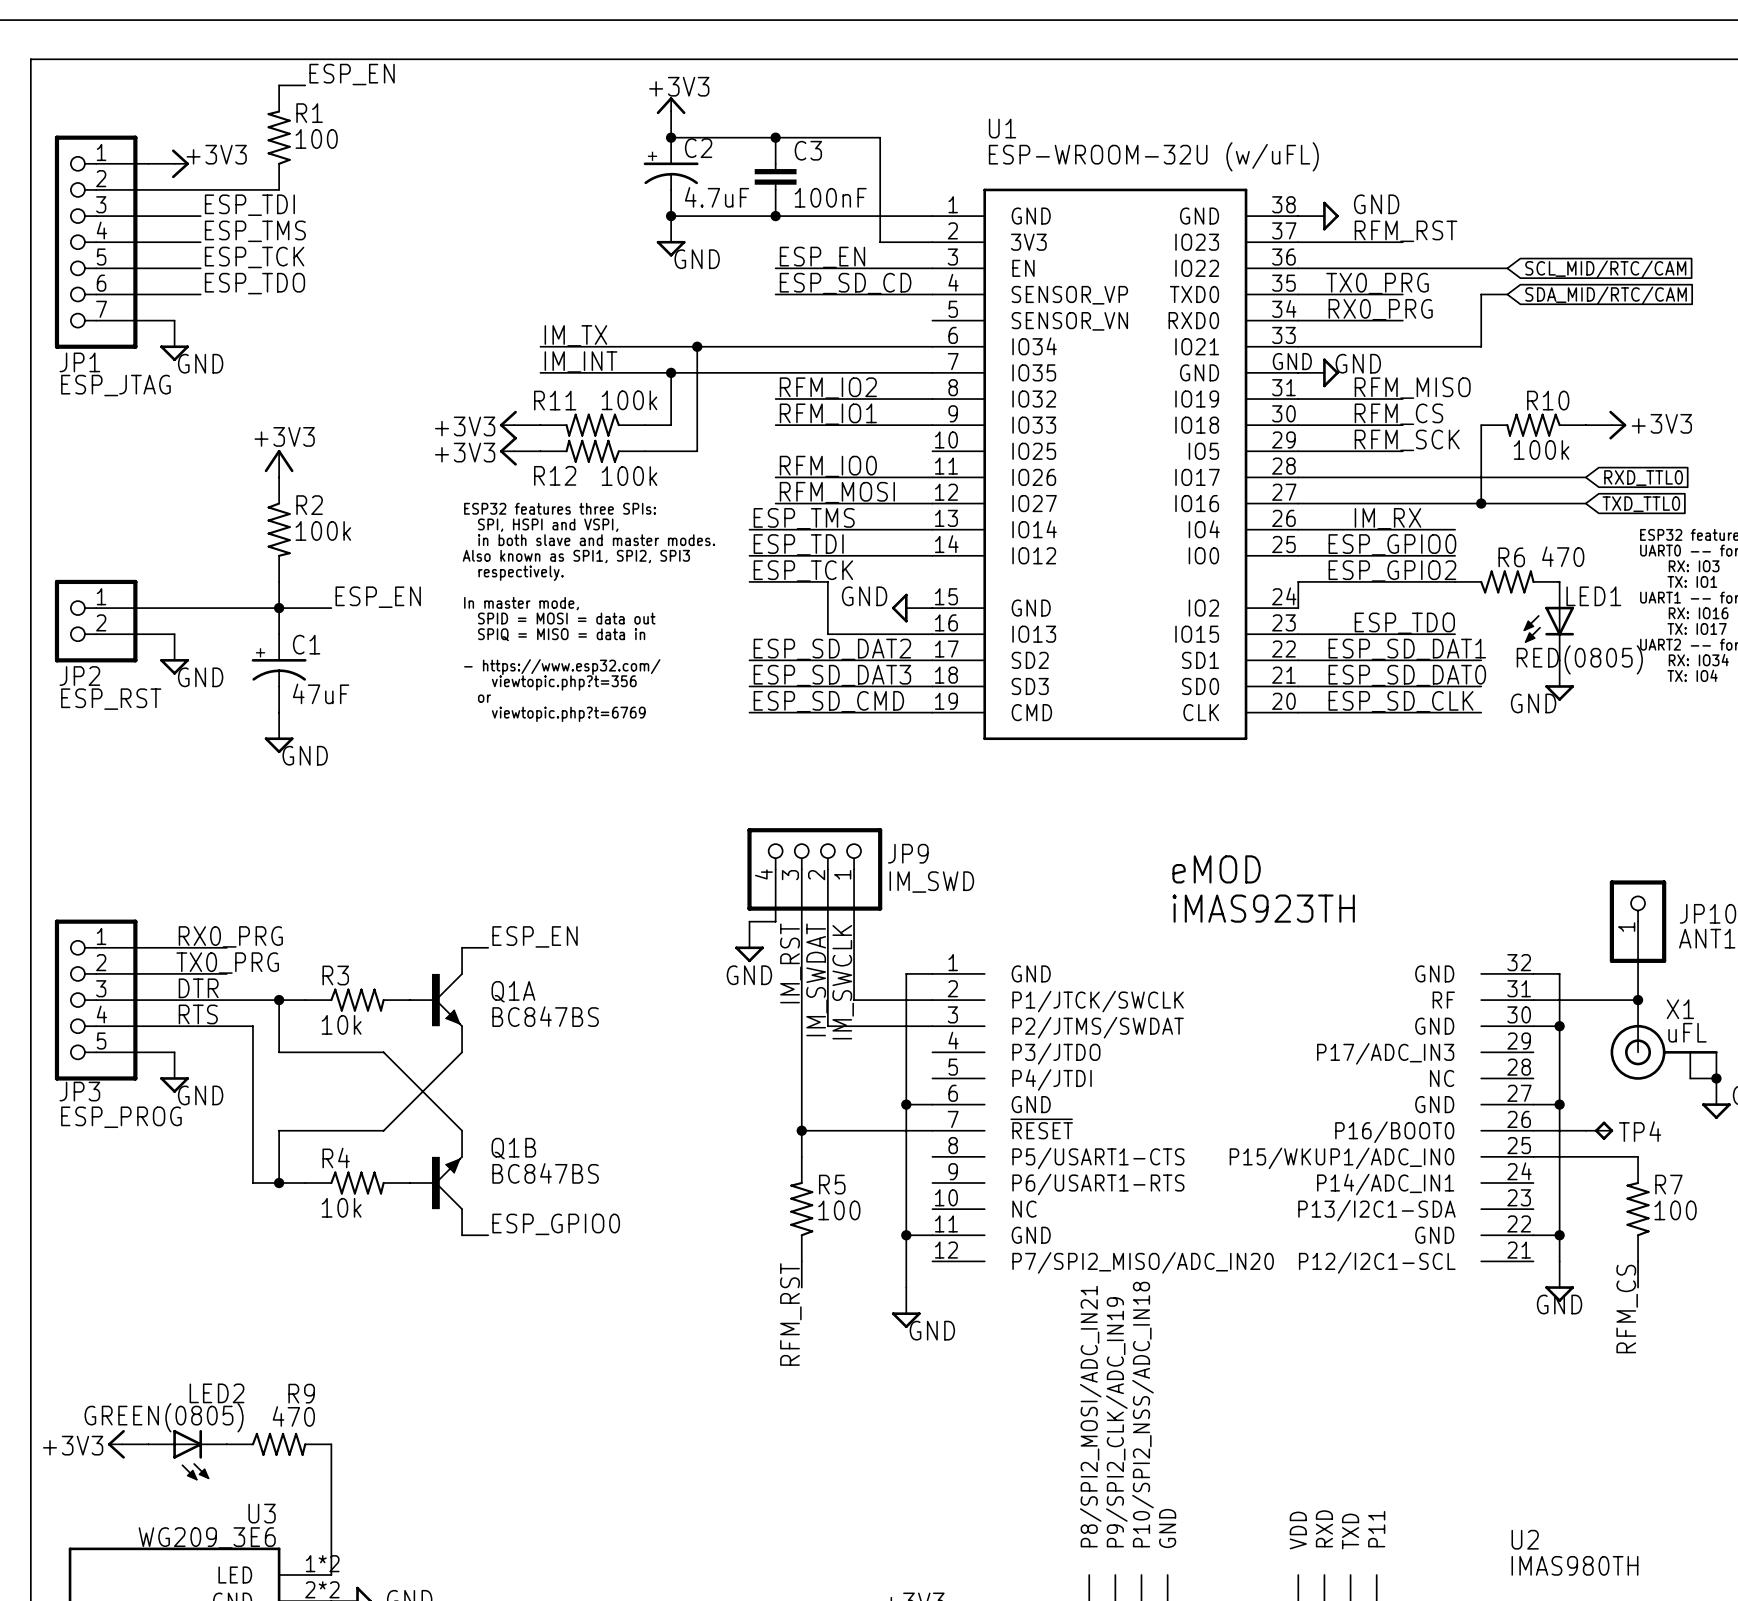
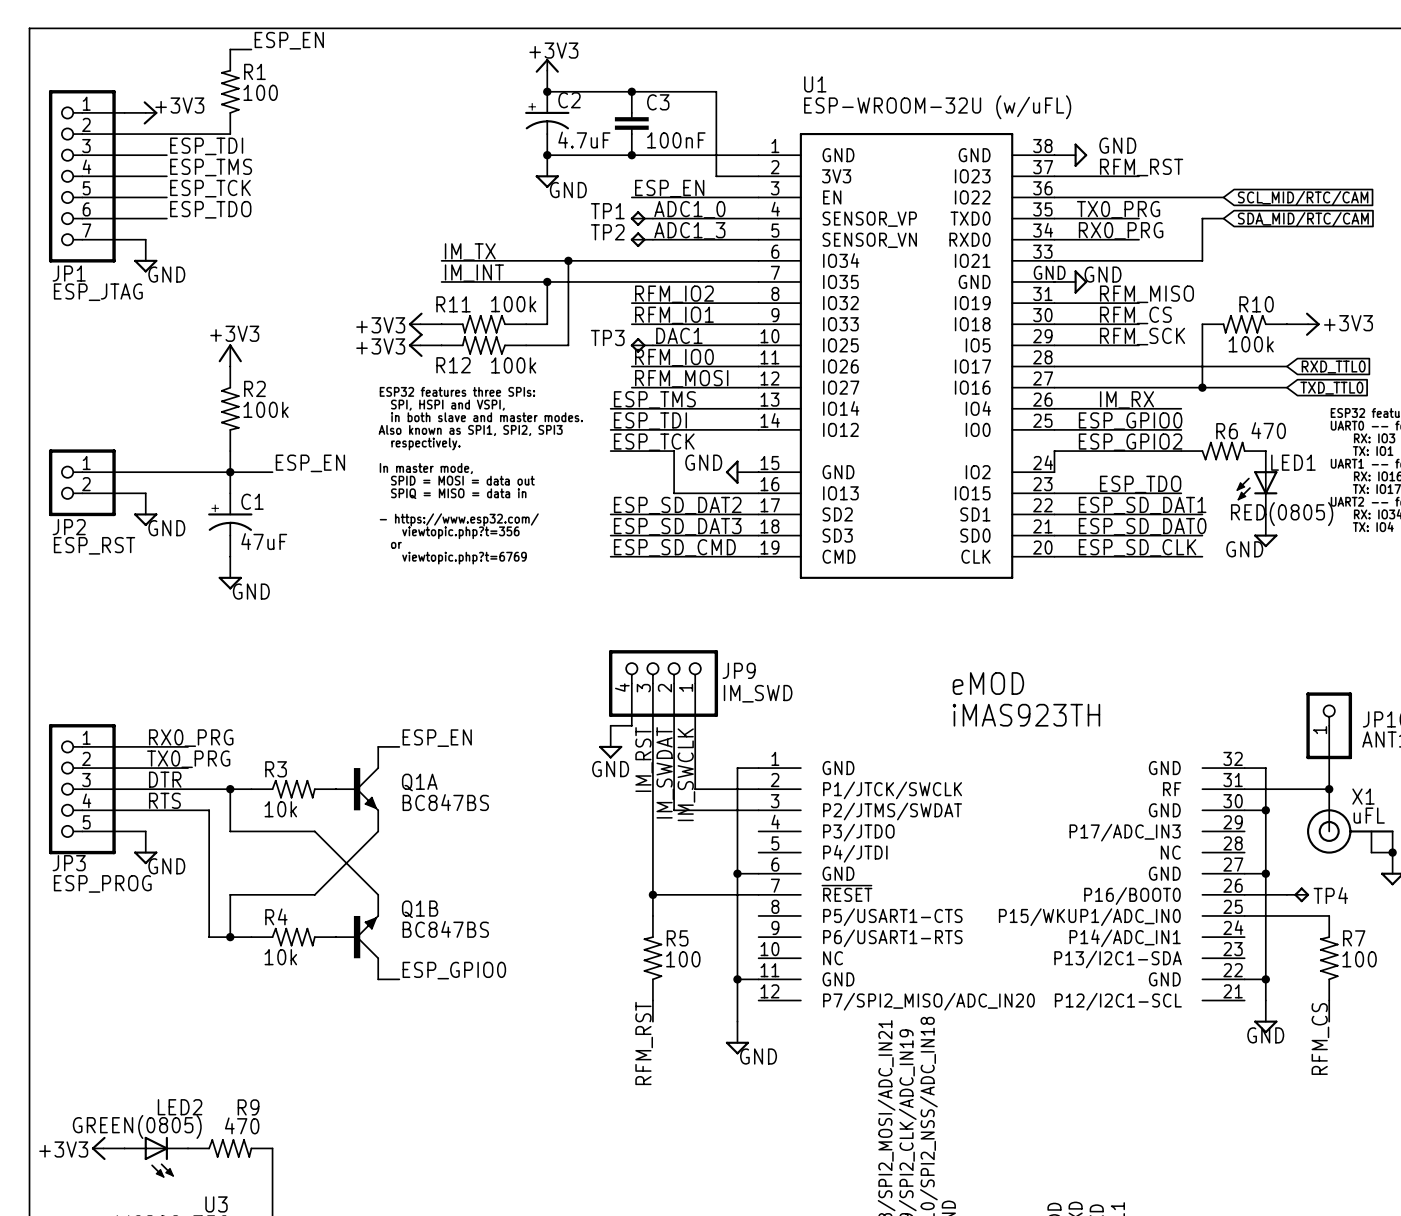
label: ESP_SD_CD (845, 283) -> none
label: none -> ADC1_0 (689, 209)
TP1: none -> (641, 218)
label: none -> ADC1_3 (689, 230)
TP2: none -> (641, 239)
wire: none -> (652, 239) (758, 239)
label: none -> DAC1 (679, 335)
TP3: none -> (641, 345)
wire: none -> (652, 345) (758, 345)

